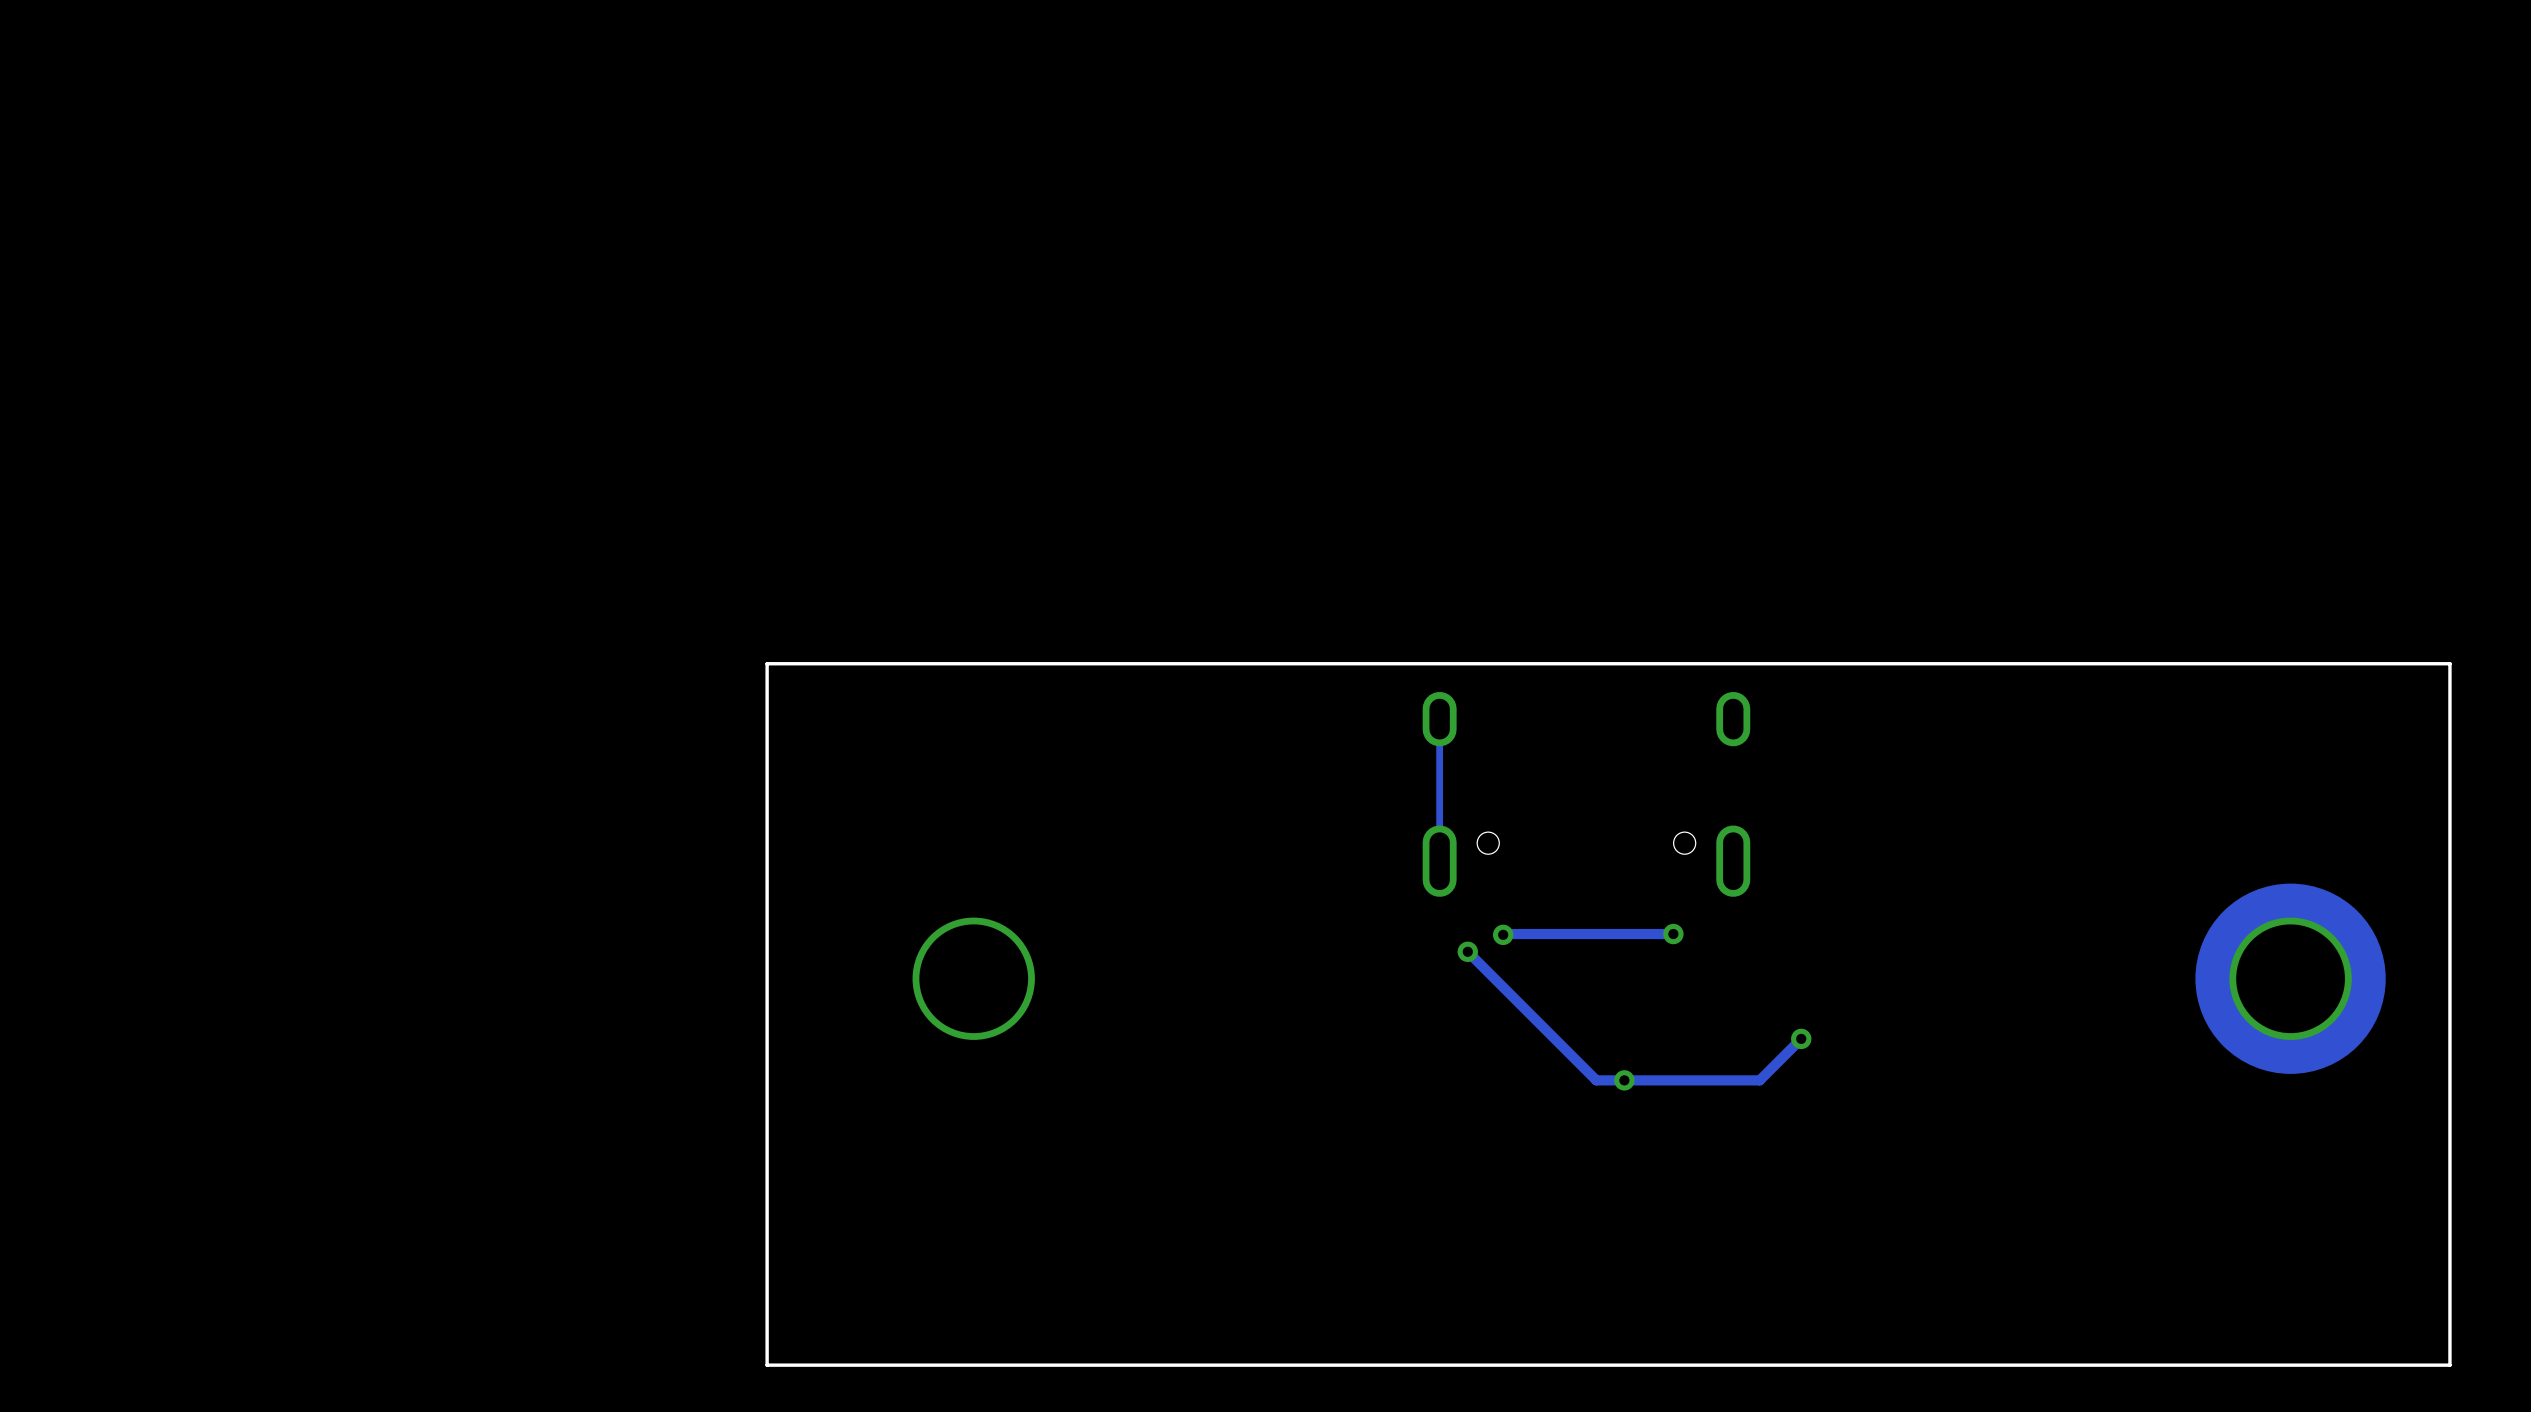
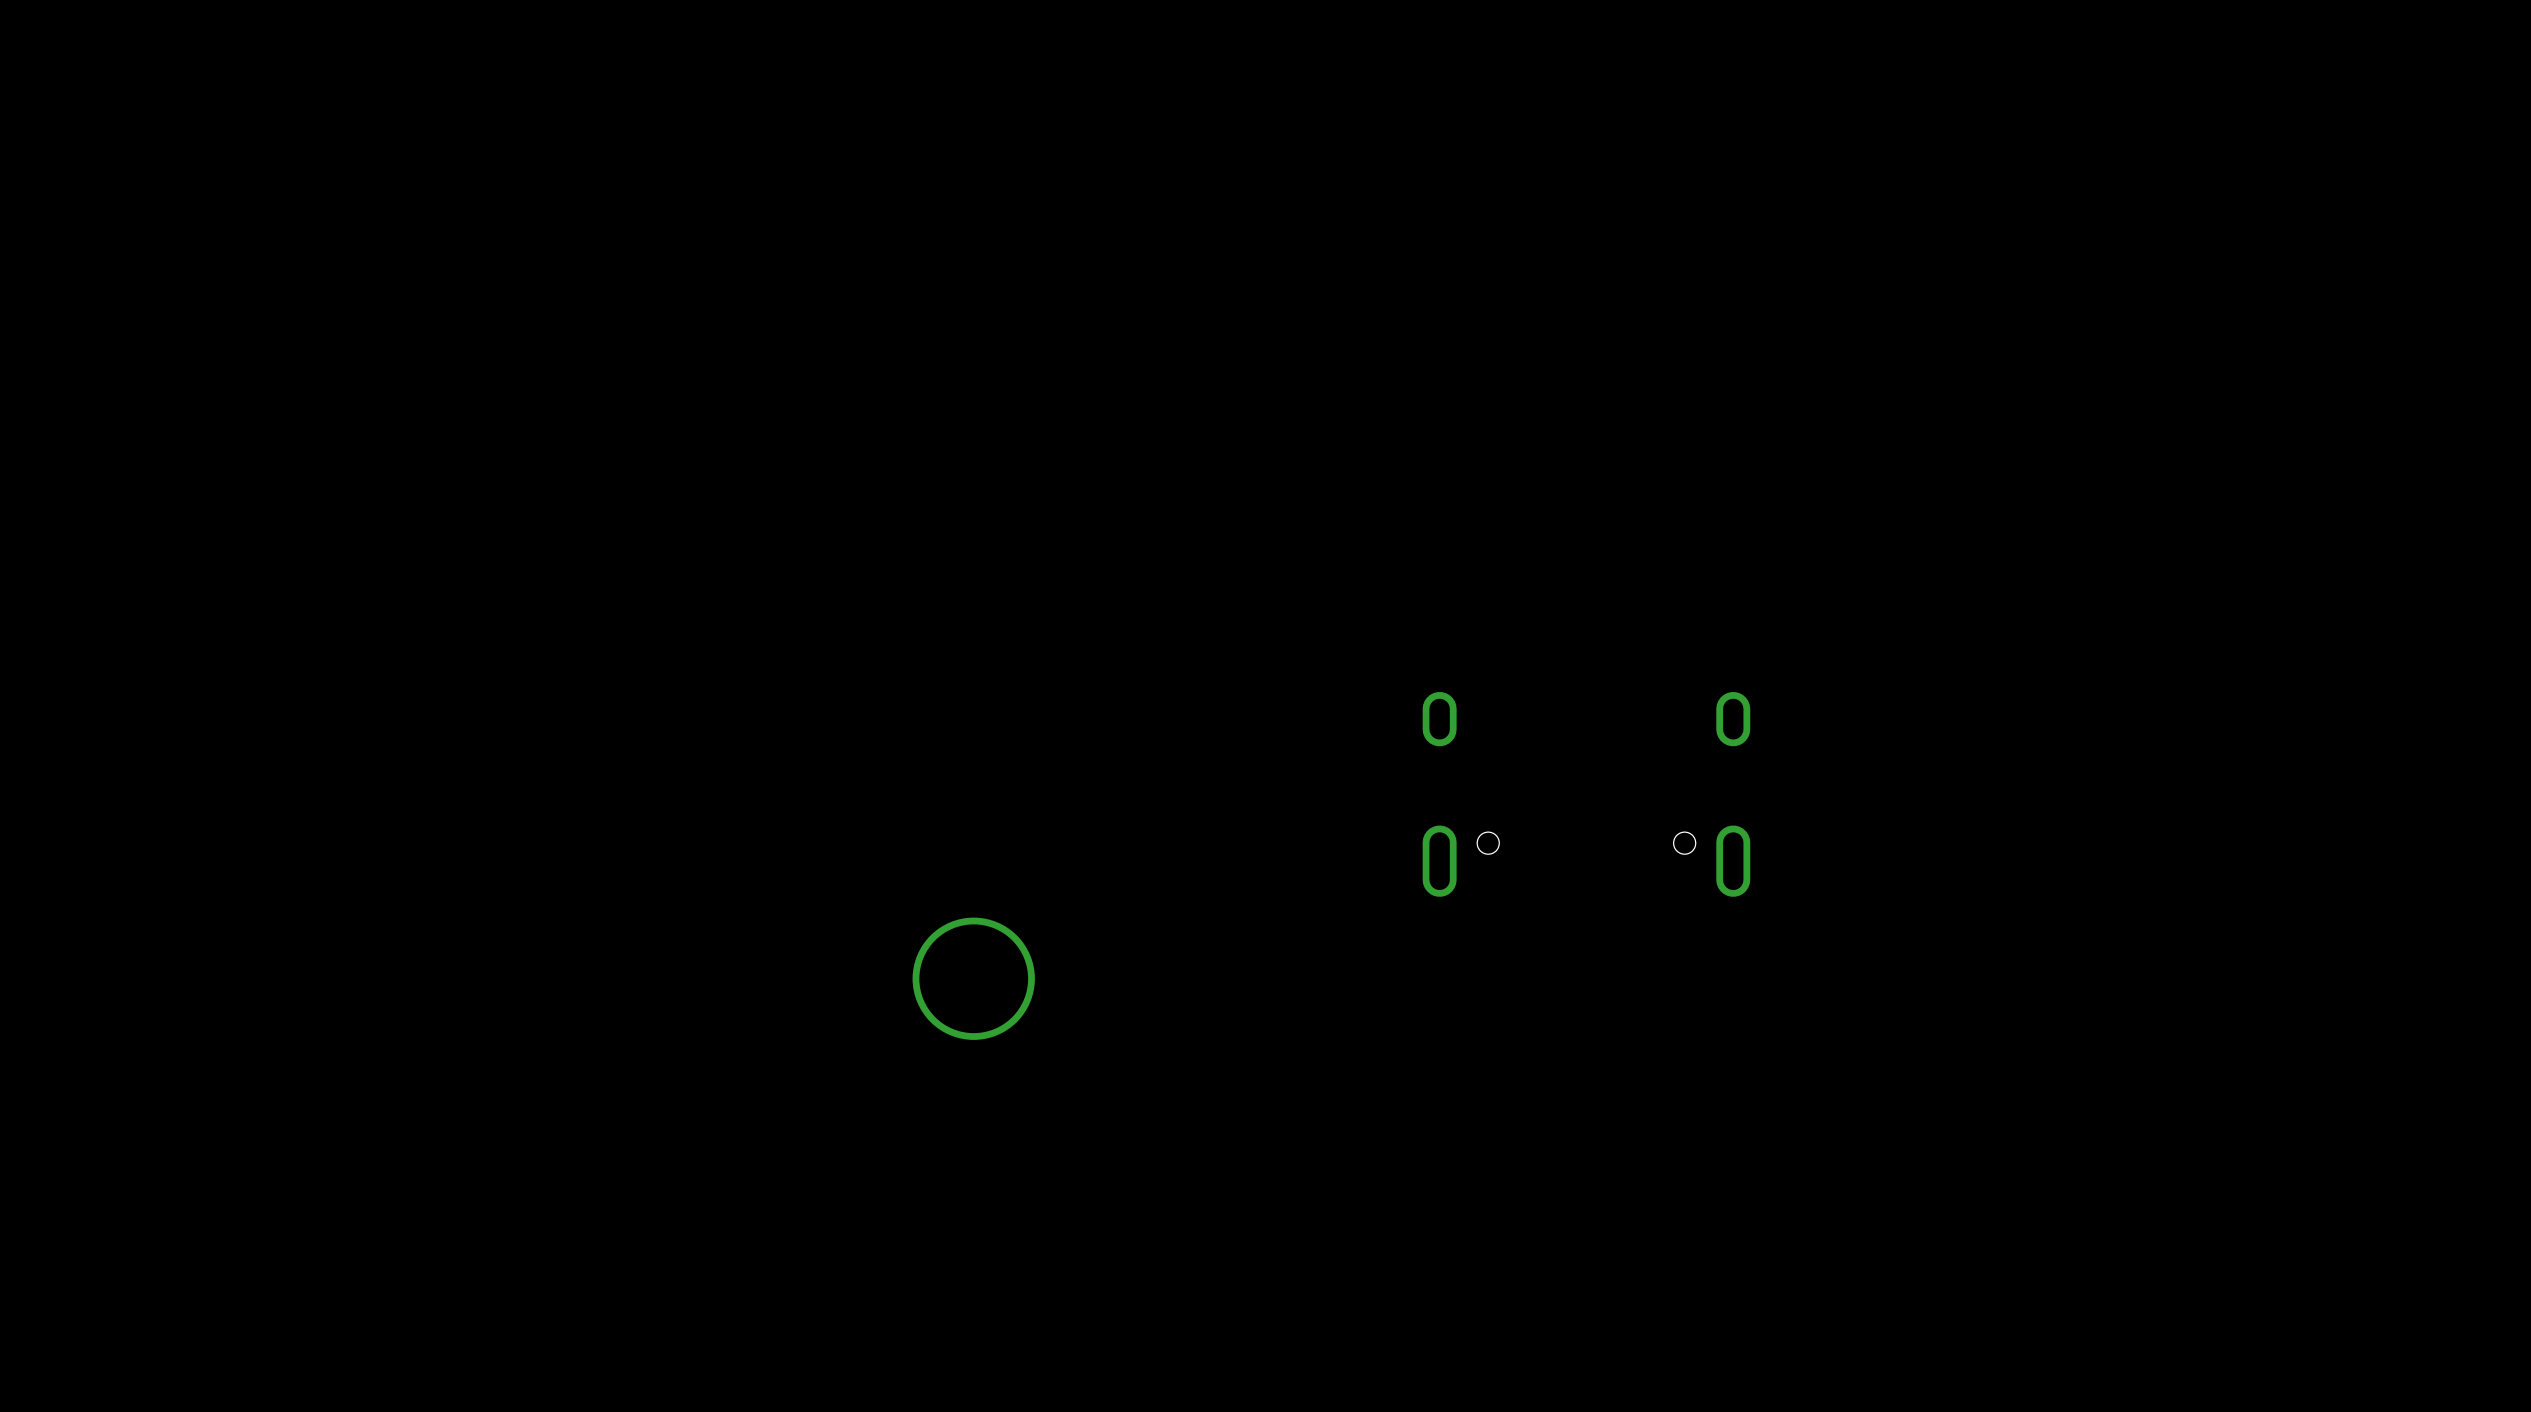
board edge: (2449, 663) (767, 663) (767, 1365) (2449, 1365) (2449, 663) -> none
track: (1439, 719) (1439, 861) -> none
via: (1503, 934) -> none
track: (1673, 934) (1503, 934) -> none
via: (1673, 934) -> none
track: (1467, 951) (1596, 1080) (1759, 1080) (1801, 1038) -> none
via: (1467, 951) -> none
part: (2290, 978) -> none
via: (1801, 1038) -> none
via: (1624, 1080) -> none

